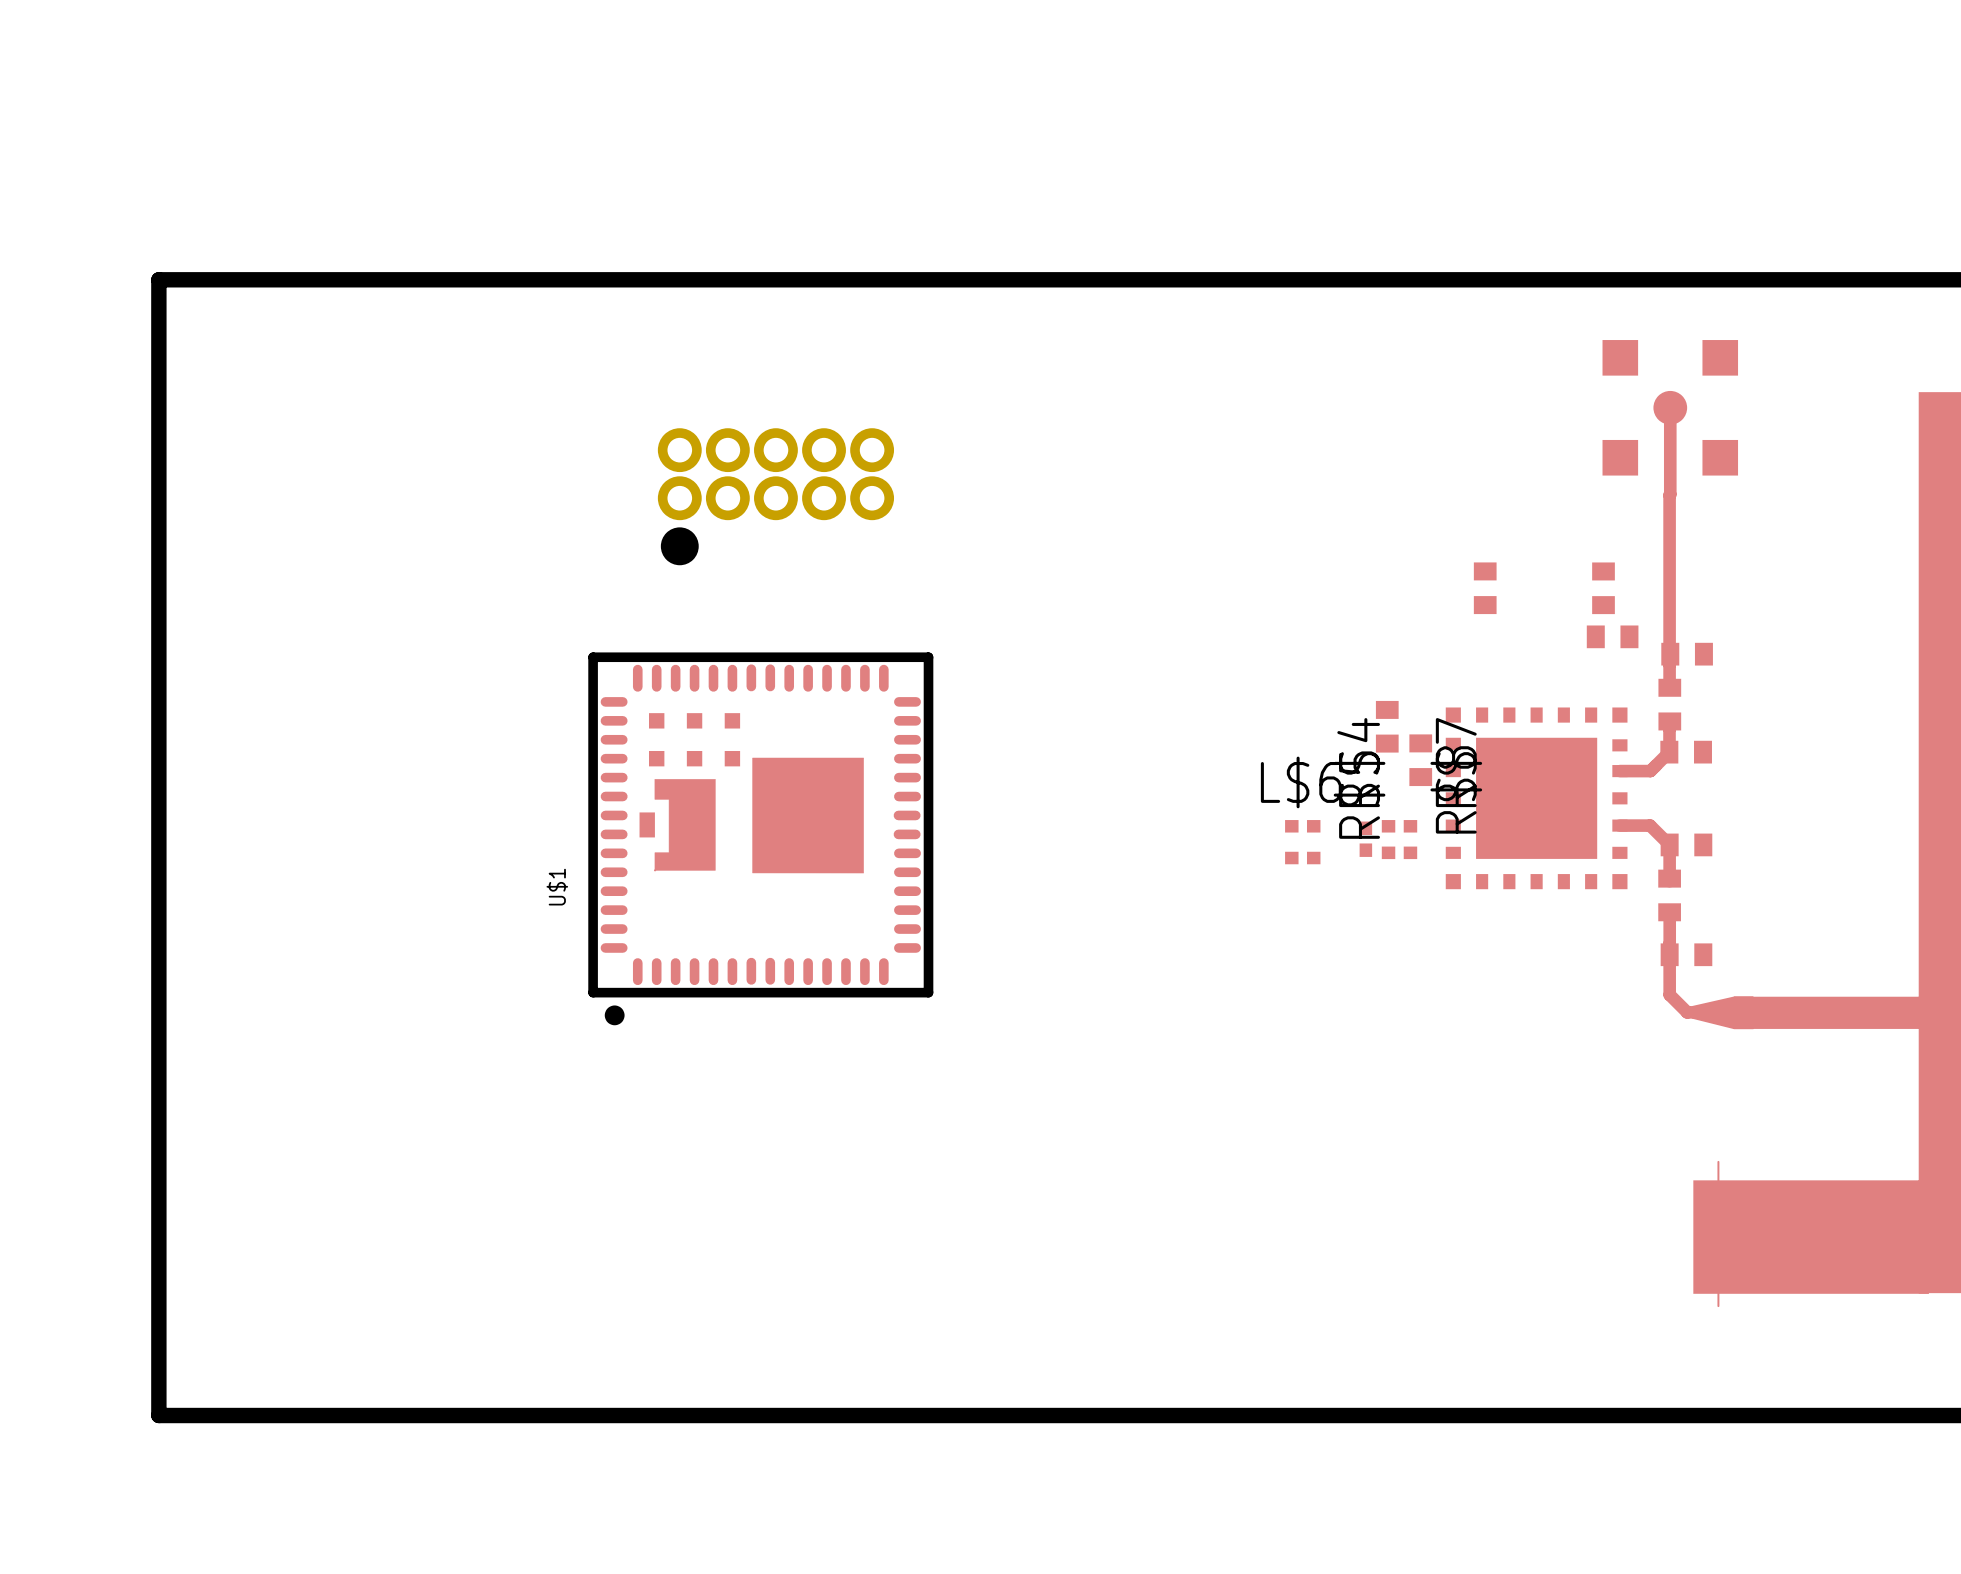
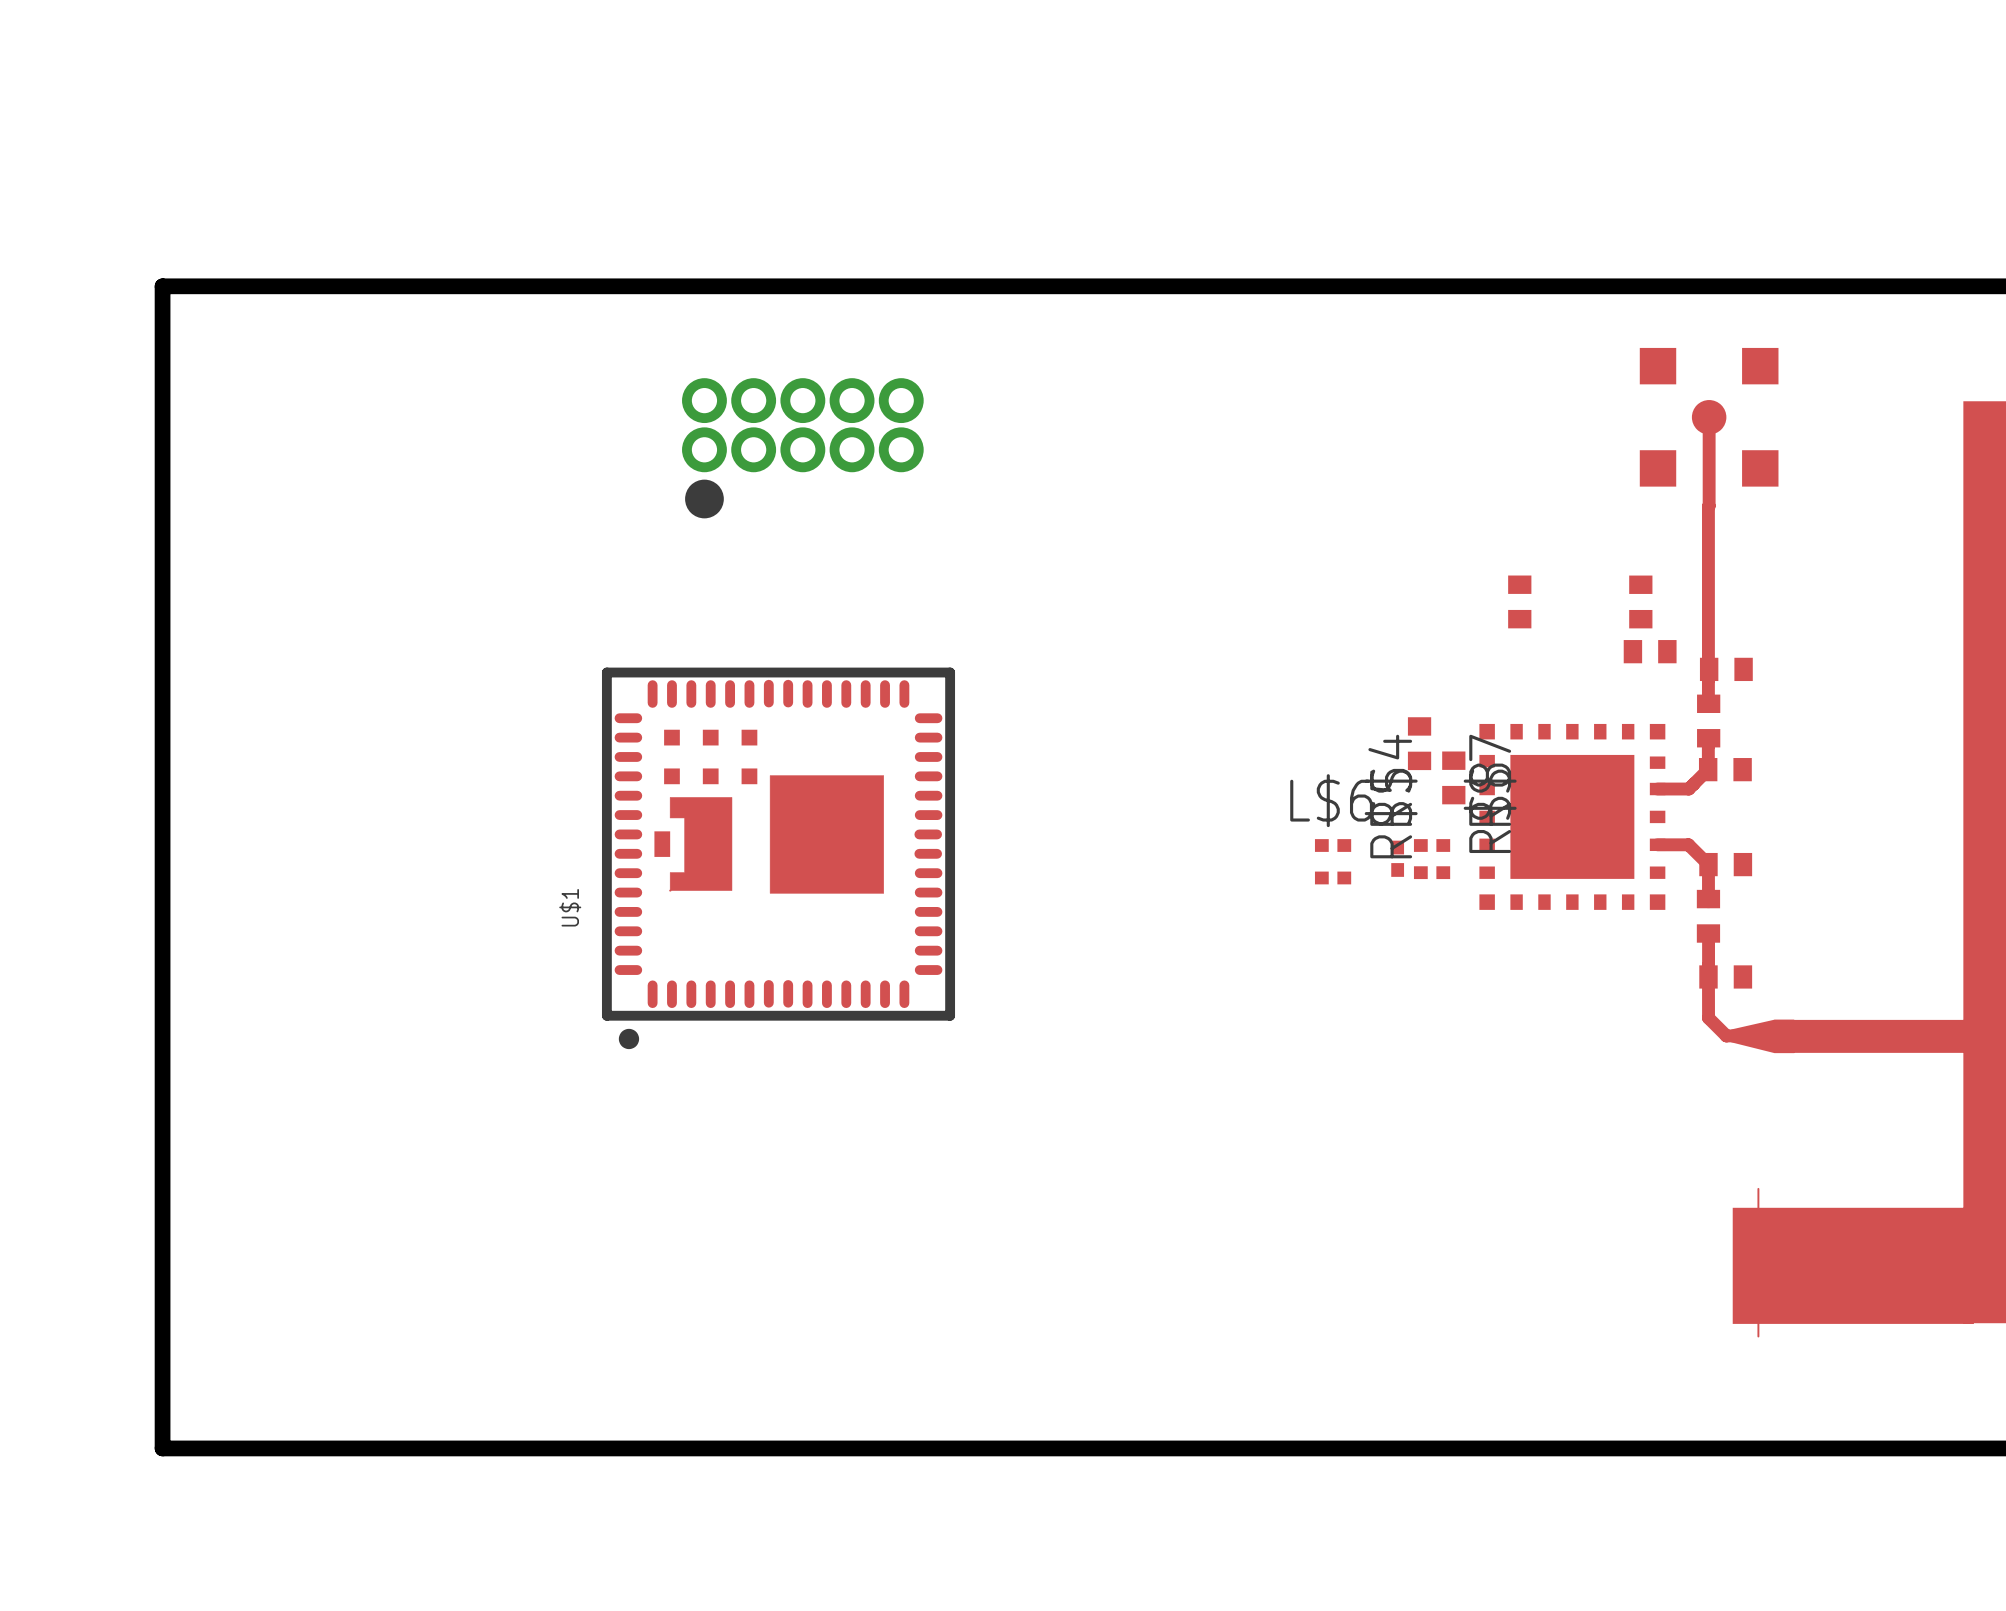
part position: (775, 496) -> (802, 448)

